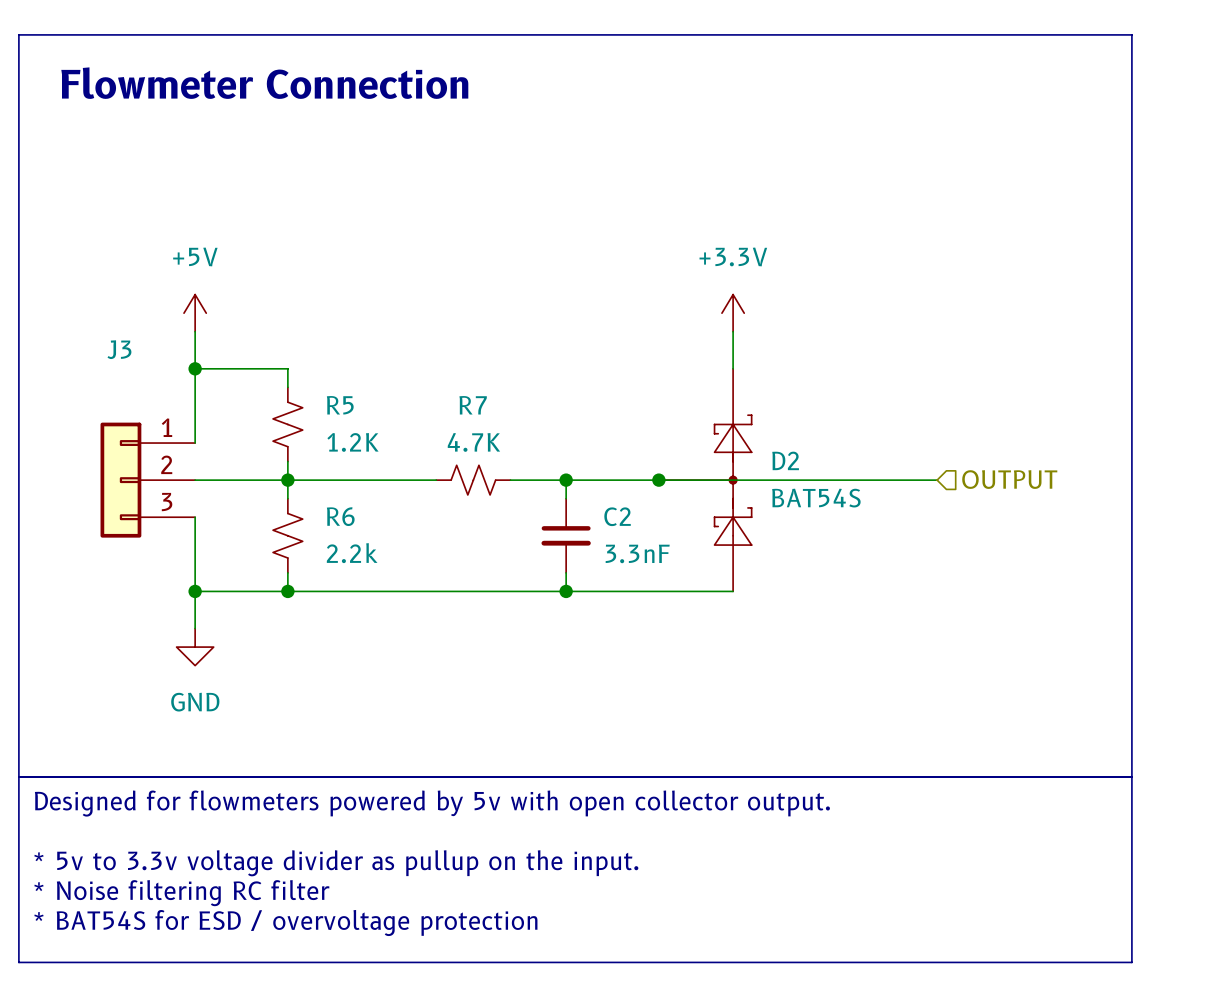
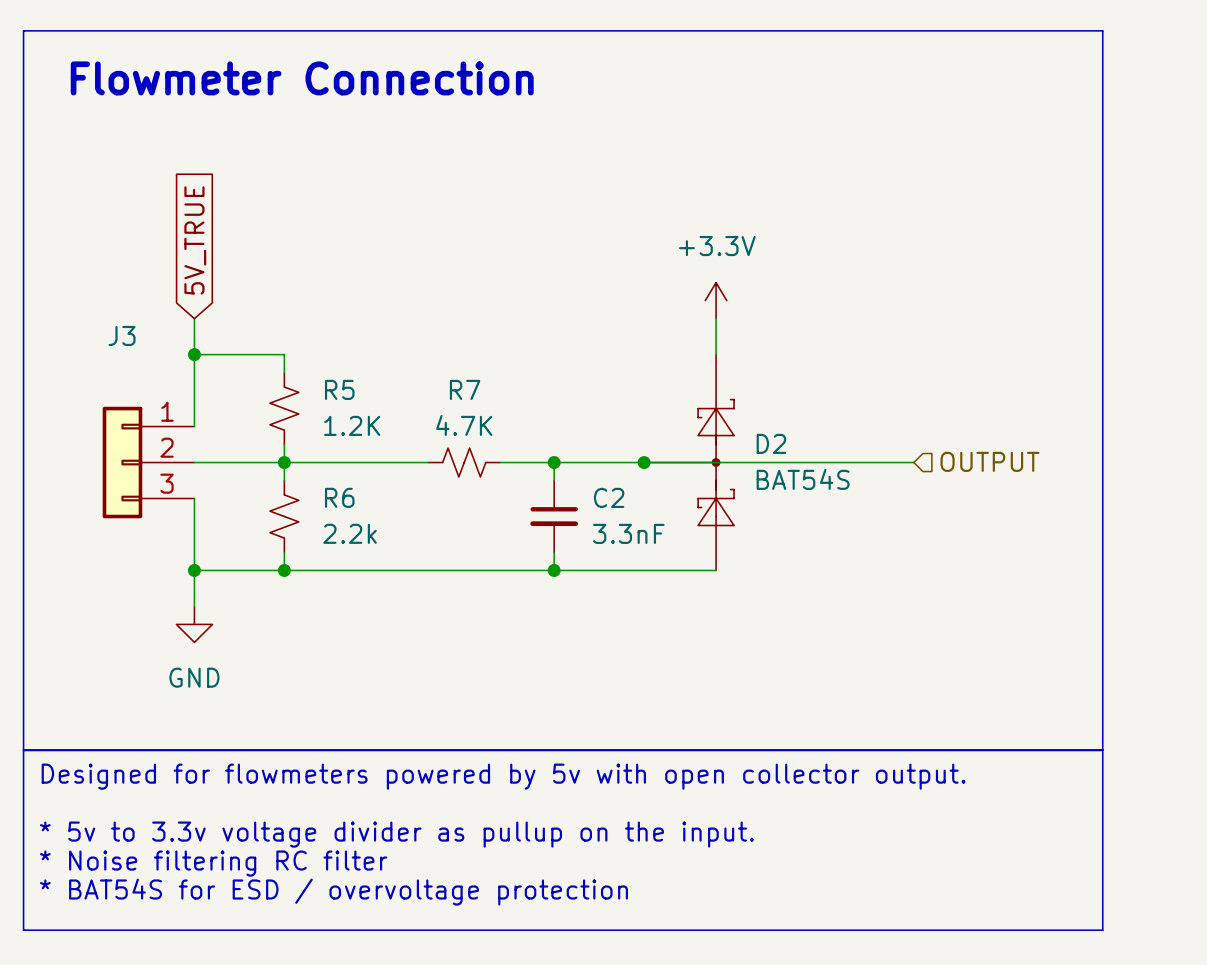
global label: none -> 5V_TRUE (195, 240)
power symbol: +5V (195, 313) -> none

